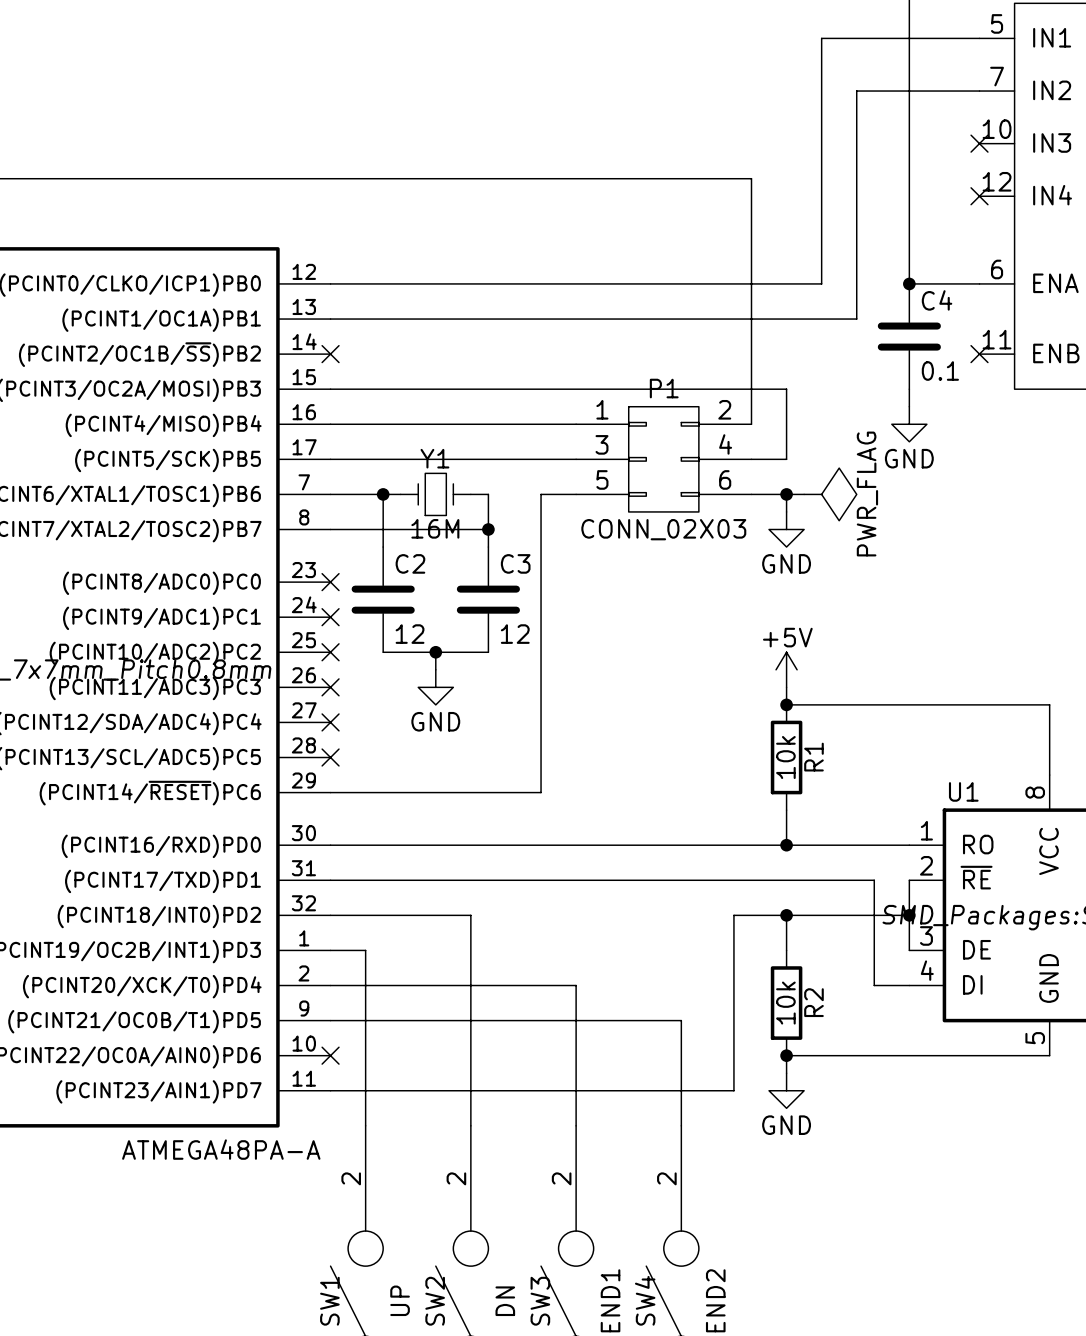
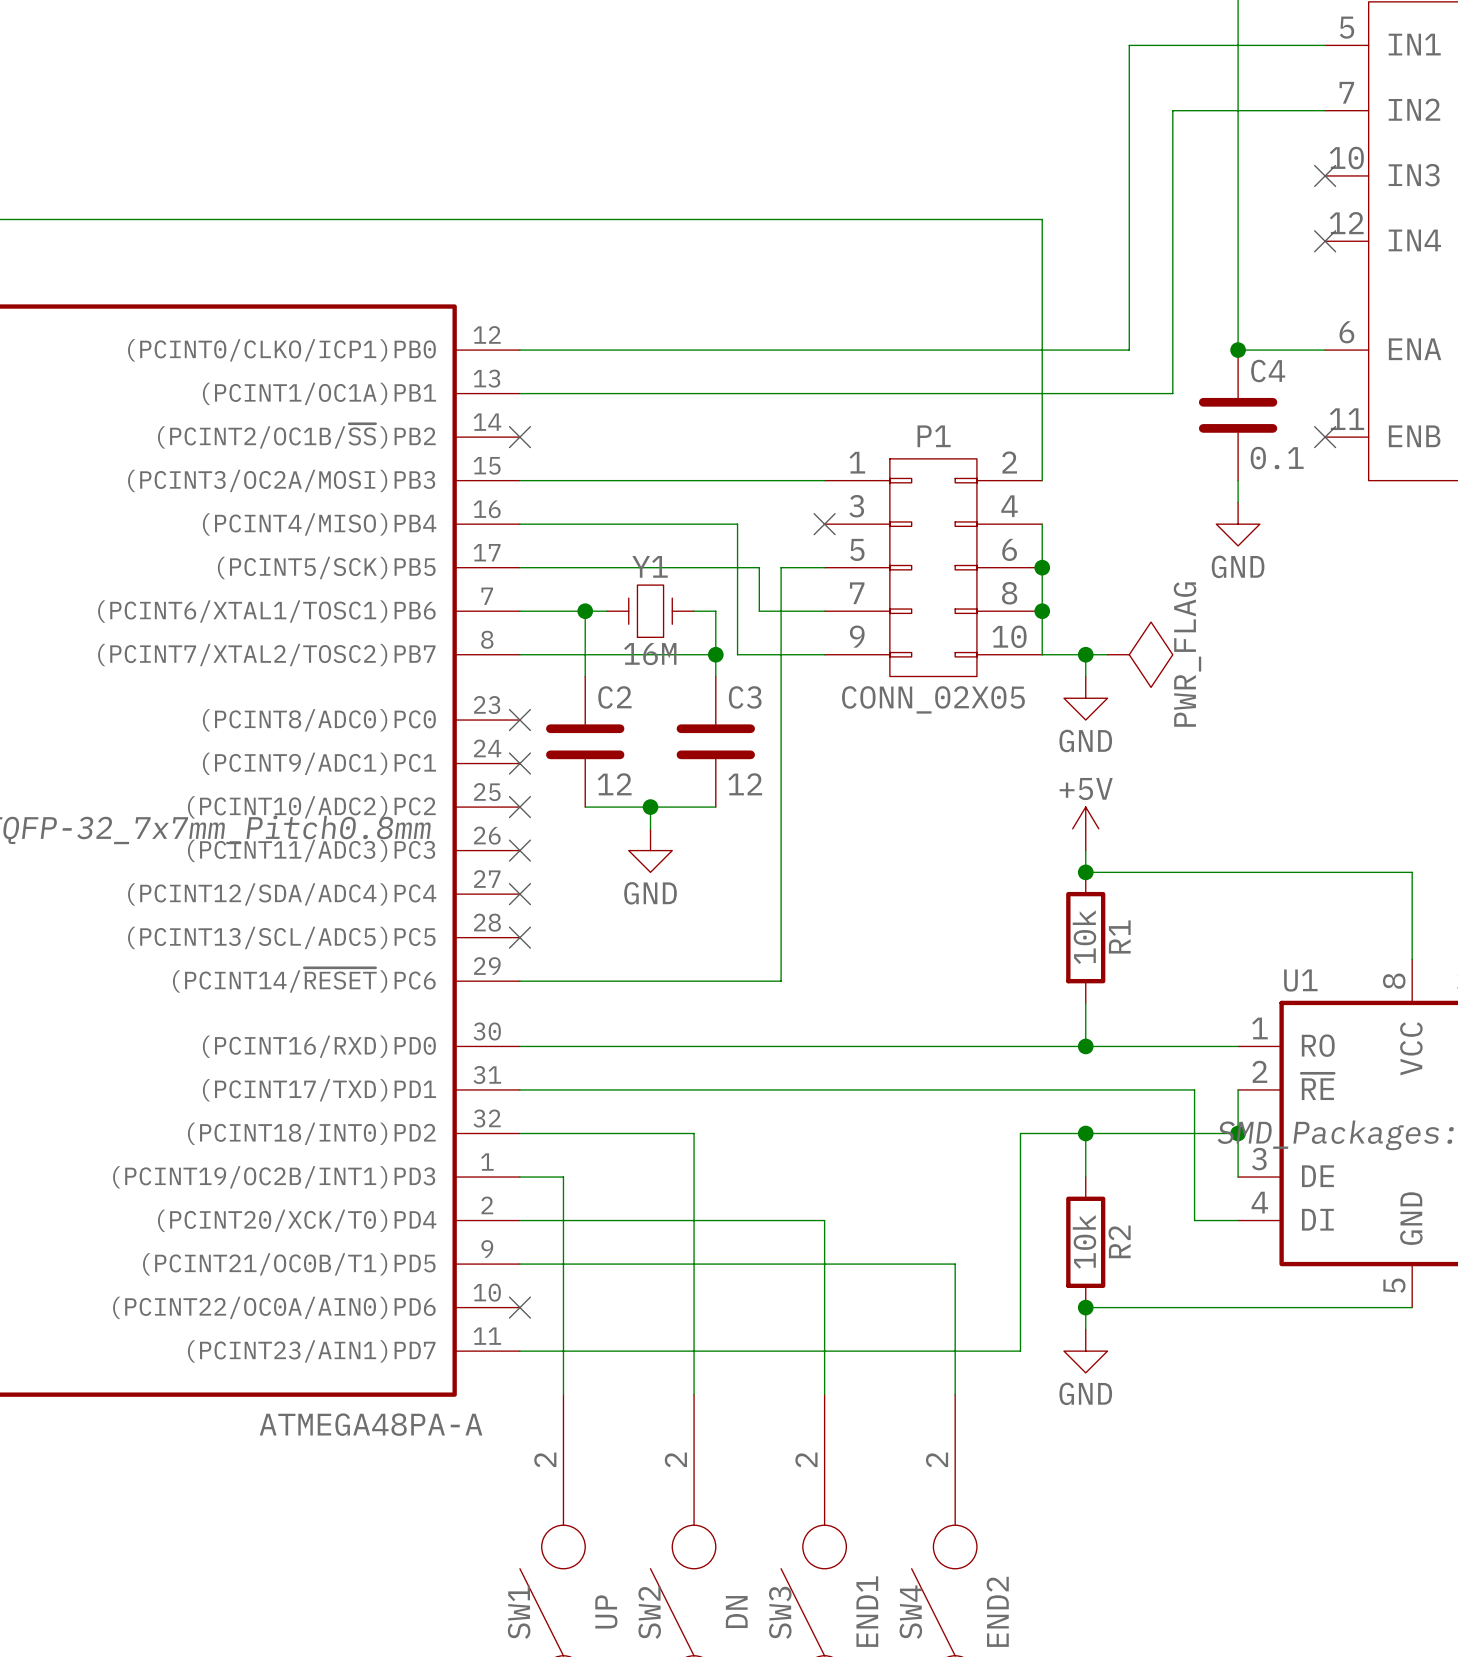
P1 name position: P1 (664, 388) -> P1 (934, 436)
wire: (576, 389) (786, 389) (786, 459) (751, 459) -> none
wire: (751, 389) (751, 424) -> (1107, 654) (1042, 654) (1042, 524)
P1 symbol: [576, 406, 752, 512] -> [824, 458, 1043, 677]
wire: (505, 424) (576, 424) -> (737, 524) (737, 654) (824, 654)
no-connect mark: none -> (824, 524)
wire: (523, 459) (541, 459) -> (759, 567) (759, 611) (781, 611) (781, 567)
junction: none -> (1042, 567)
wire: (751, 494) (804, 494) -> none
junction: none -> (1042, 611)
wire: (786, 494) (786, 511) -> (1085, 654) (1085, 676)
junction: (786, 494) -> none
power symbol position: PWR_FLAG (830, 494) -> PWR_FLAG (1140, 654)
P1 value: CONN_02X03 (663, 529) -> CONN_02X05 (933, 699)
power symbol position: GND (786, 529) -> GND (1085, 698)
junction: none -> (1085, 654)

